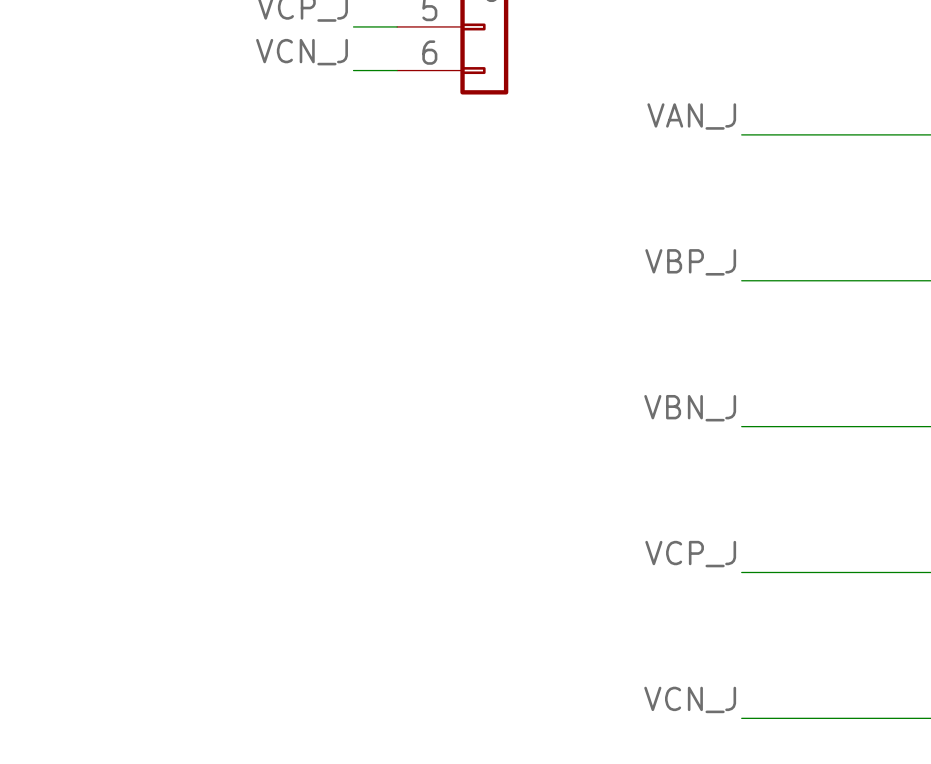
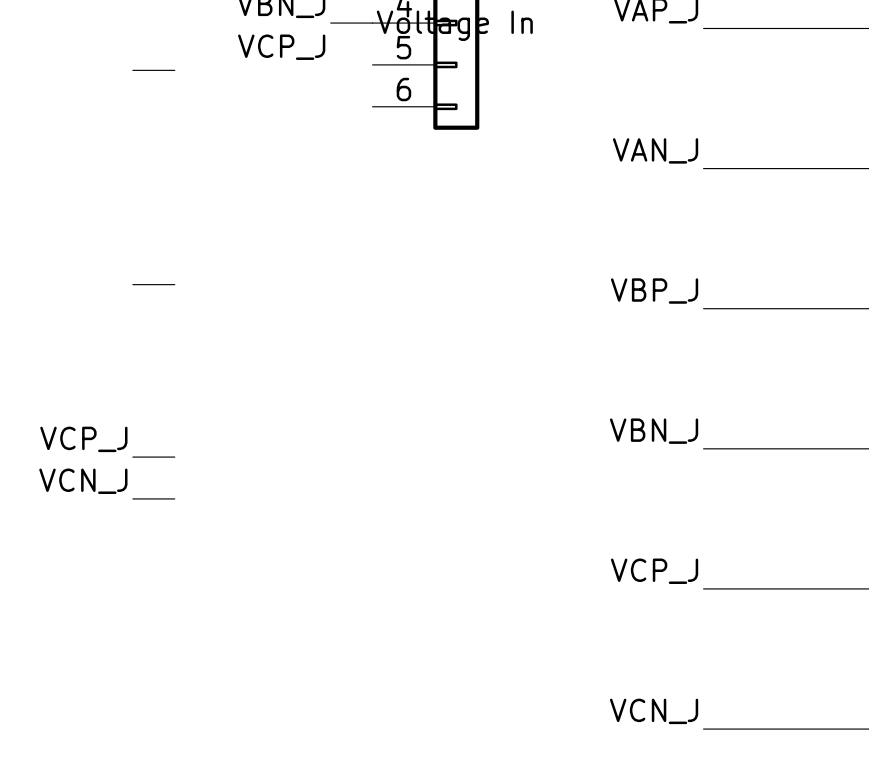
wire: (353, 26) (397, 26) -> (132, 70) (174, 70)
label: VCN_J (302, 52) -> none
wire: (353, 70) (397, 70) -> (132, 284) (174, 284)
label: none -> VCP_J (83, 439)
wire: none -> (132, 457) (174, 457)
label: none -> VCN_J (83, 481)
wire: none -> (132, 498) (174, 498)

